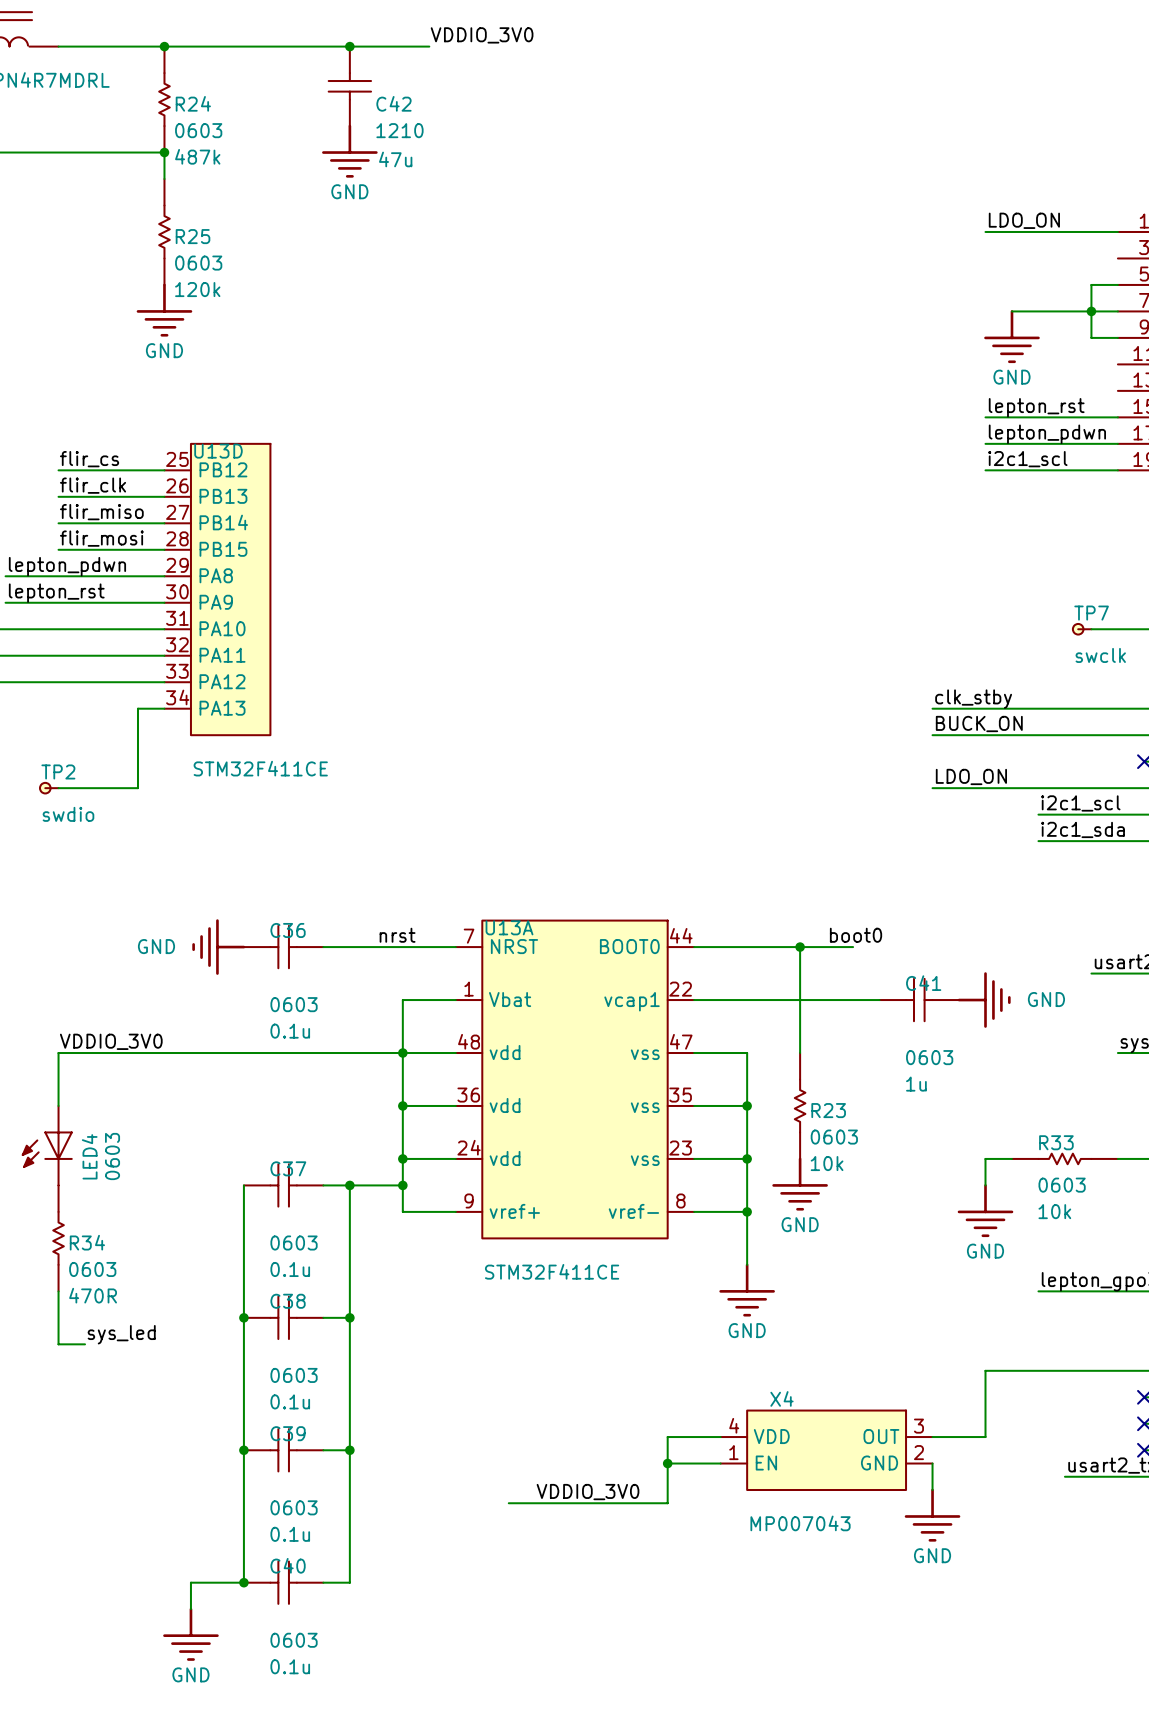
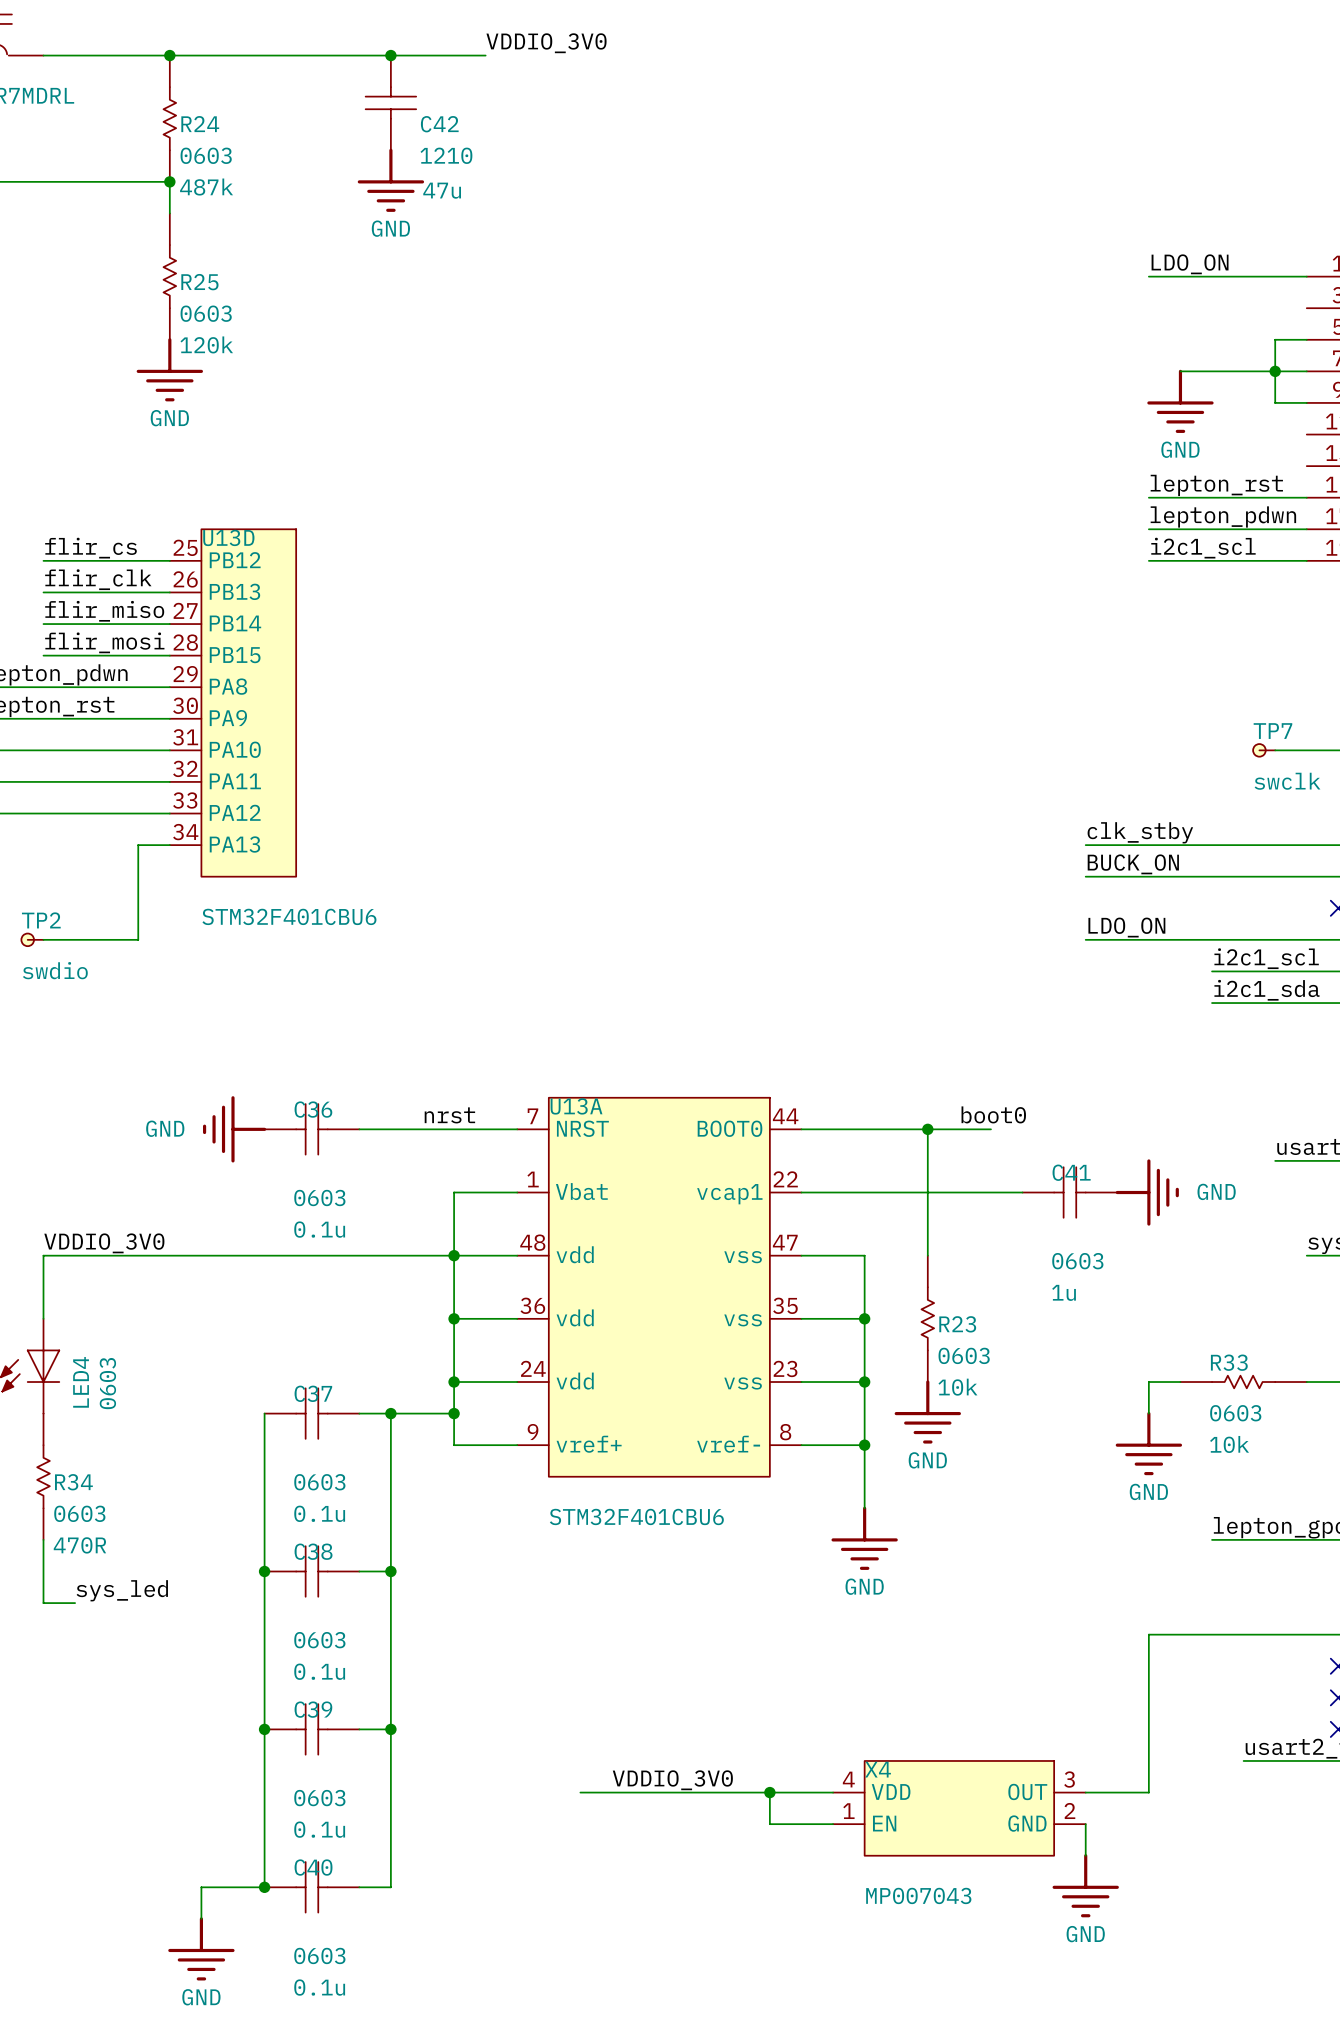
U13D value: STM32F411CE (260, 768) -> STM32F401CBU6 (289, 916)
U13A value: STM32F411CE (552, 1271) -> STM32F401CBU6 (636, 1516)
X4 name position: X4 (781, 1398) -> X4 (878, 1769)
wire: (720, 1437) (667, 1437) (667, 1503) -> none
wire: (932, 1437) (985, 1437) -> (1085, 1792) (1148, 1792) (1148, 1713)
X4 position: (826, 1450) -> (959, 1808)
wire: (667, 1463) (720, 1463) -> none
junction position: (667, 1463) -> (769, 1792)
wire: (932, 1463) (932, 1490) -> (1085, 1824) (1085, 1855)
wire: none -> (833, 1792) (769, 1792) (769, 1824) (833, 1824)
power symbol position: GND (932, 1515) -> GND (1085, 1885)

